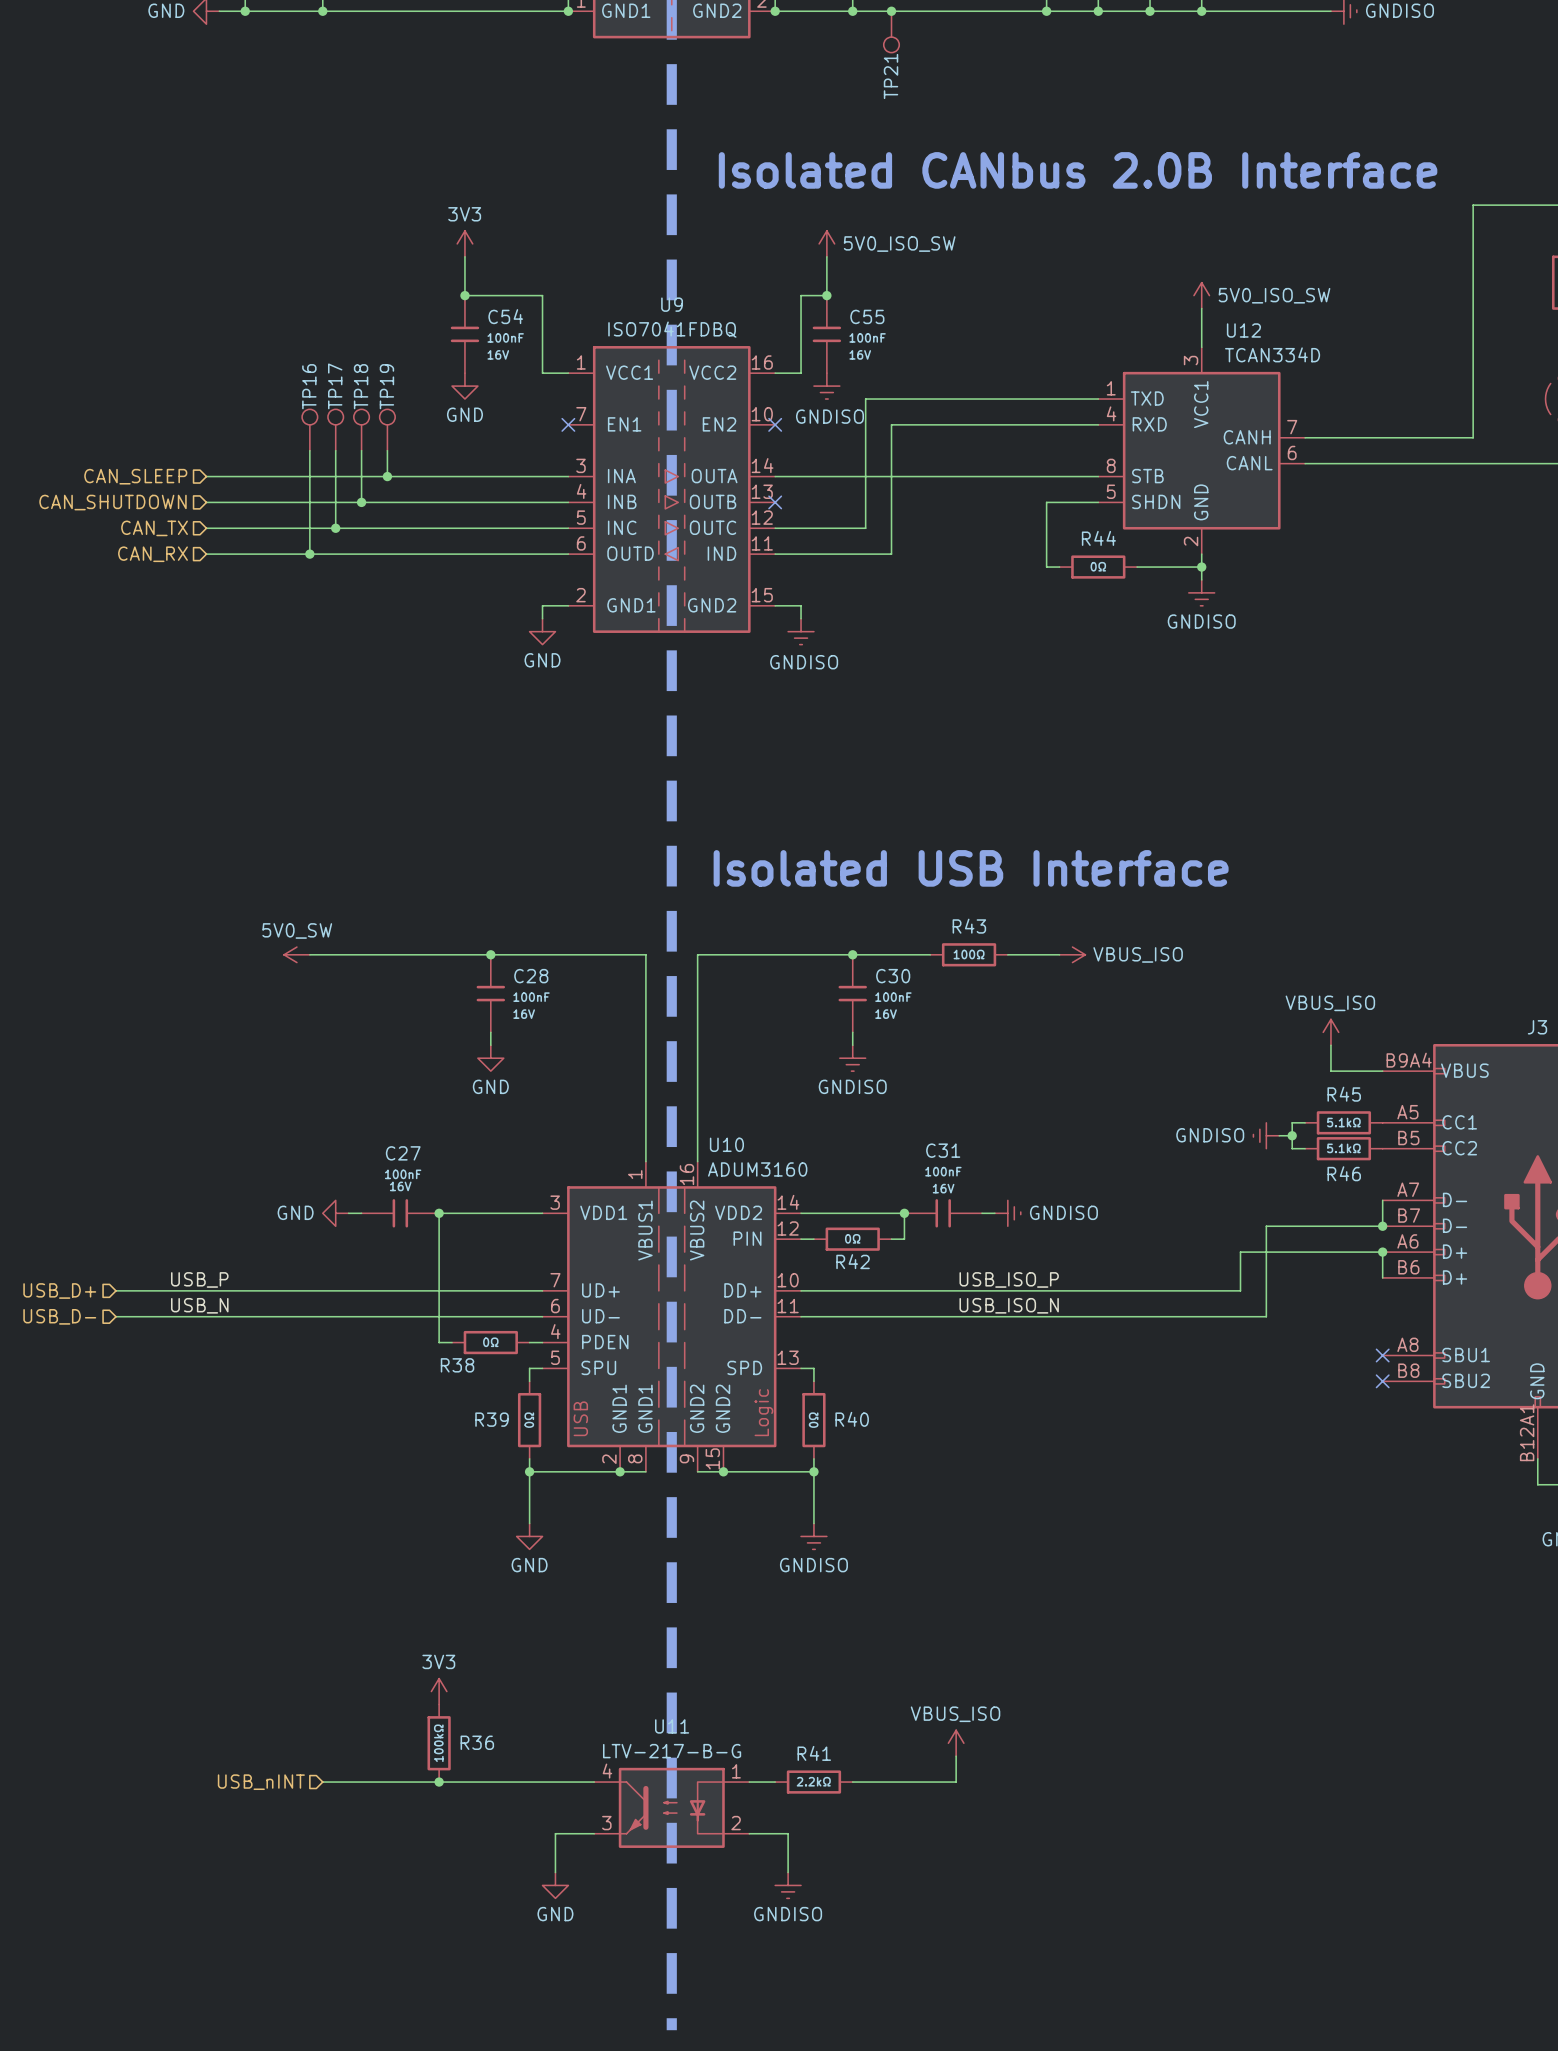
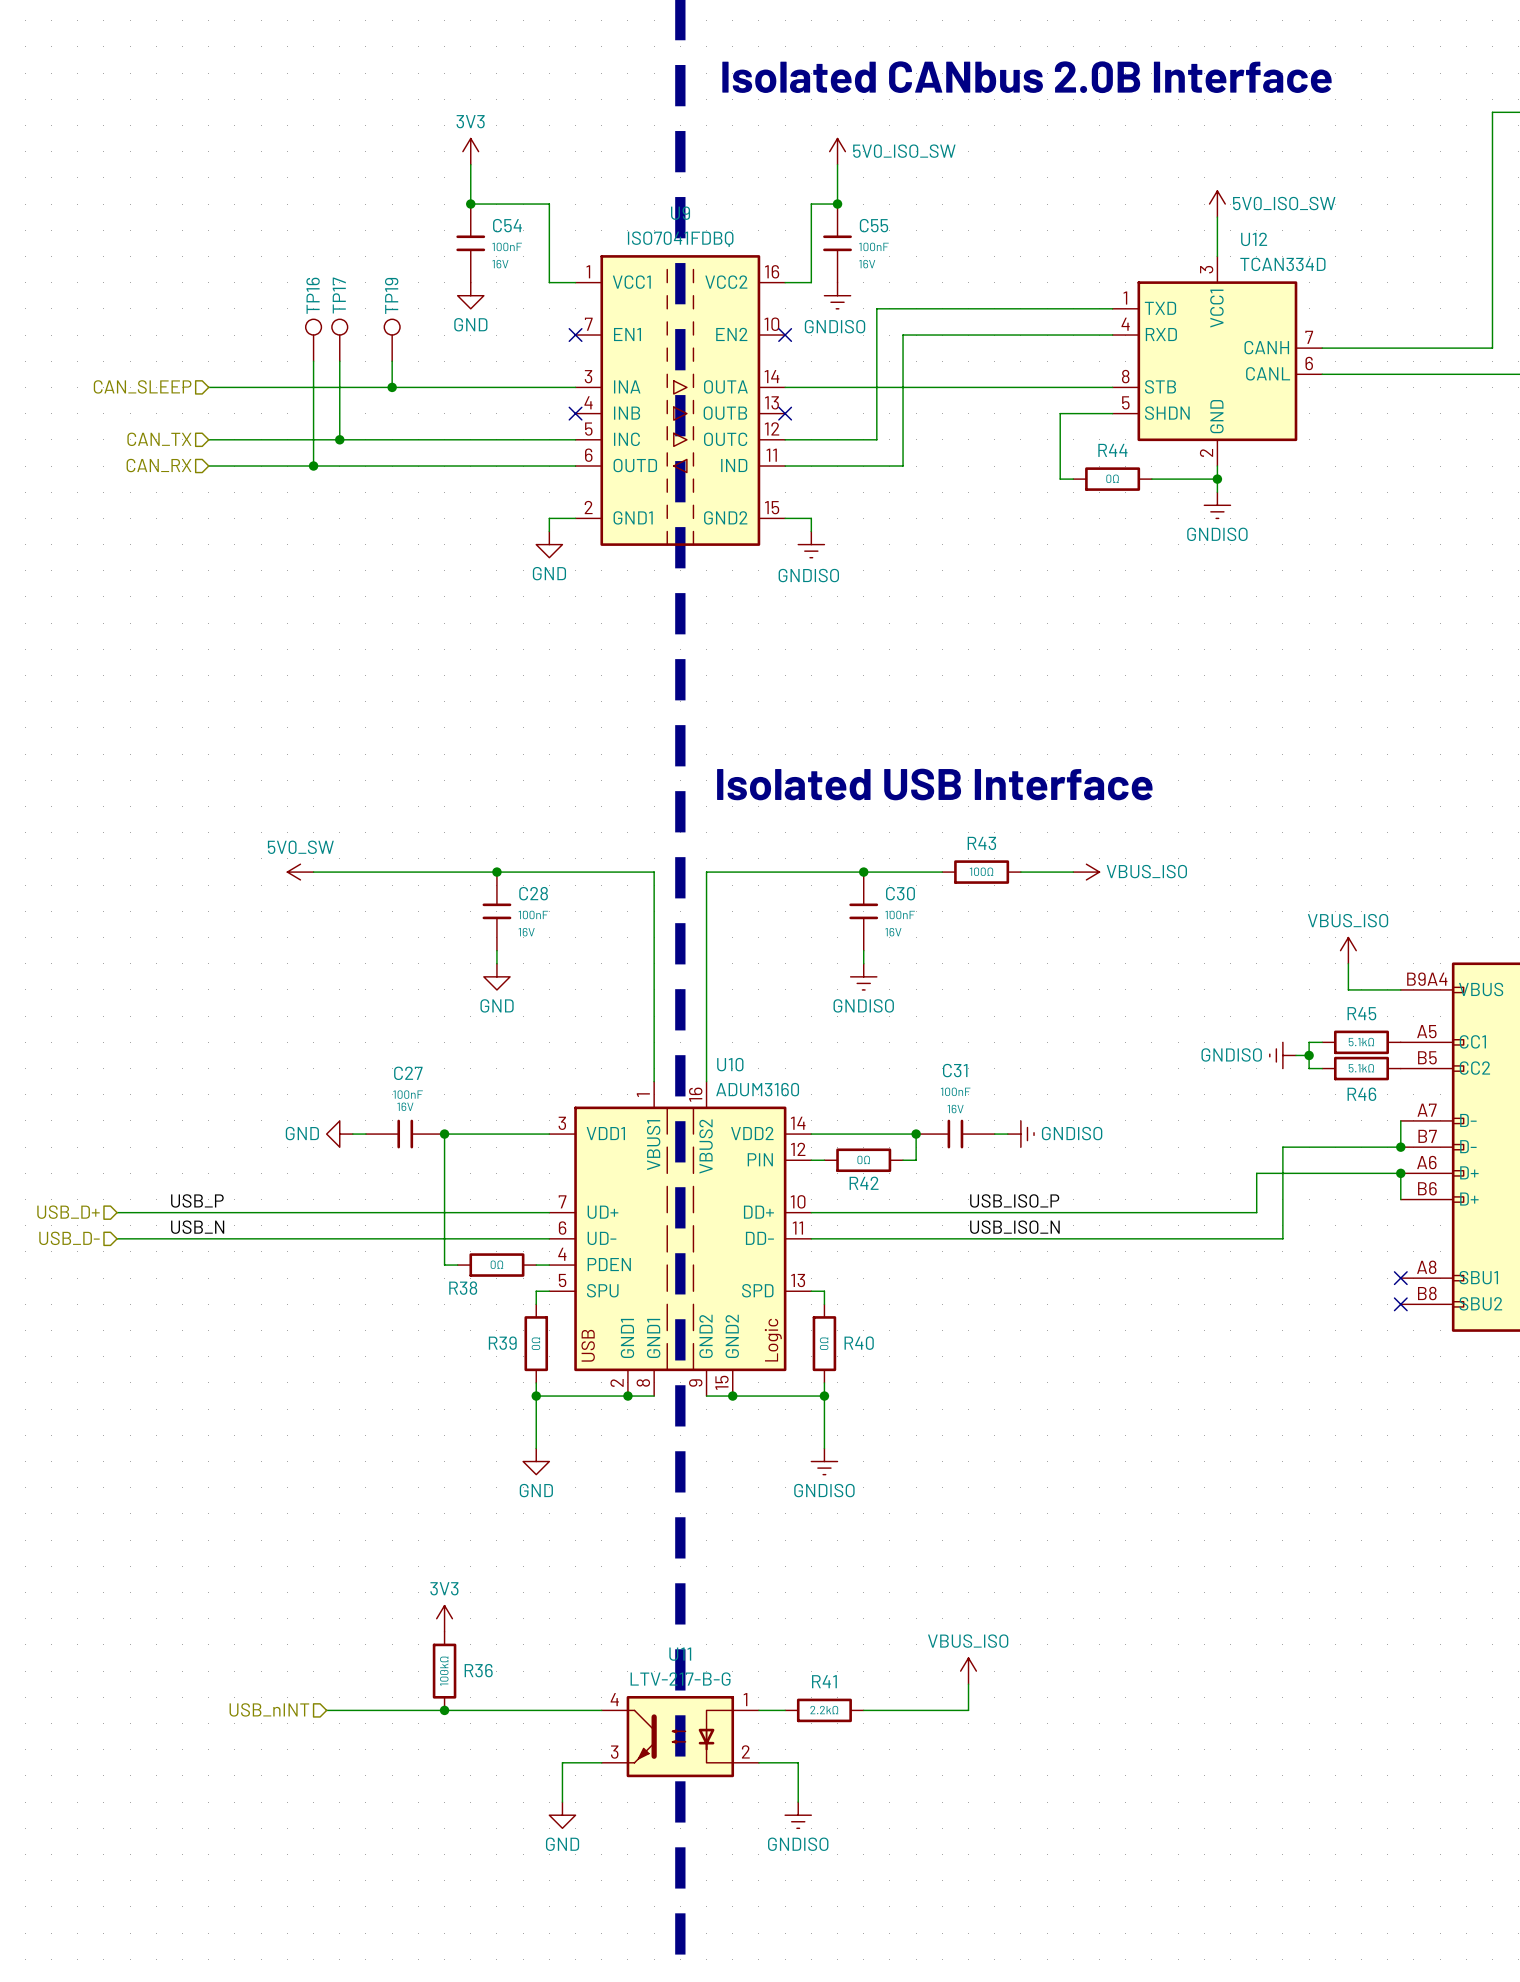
TP18: (361, 430) -> none
wire: (361, 450) (361, 502) -> none
hierarchical label: CAN_SHUTDOWN (113, 502) -> none
wire: (206, 502) (568, 502) -> none
junction: (361, 502) -> none
no-connect mark: none -> (575, 413)

